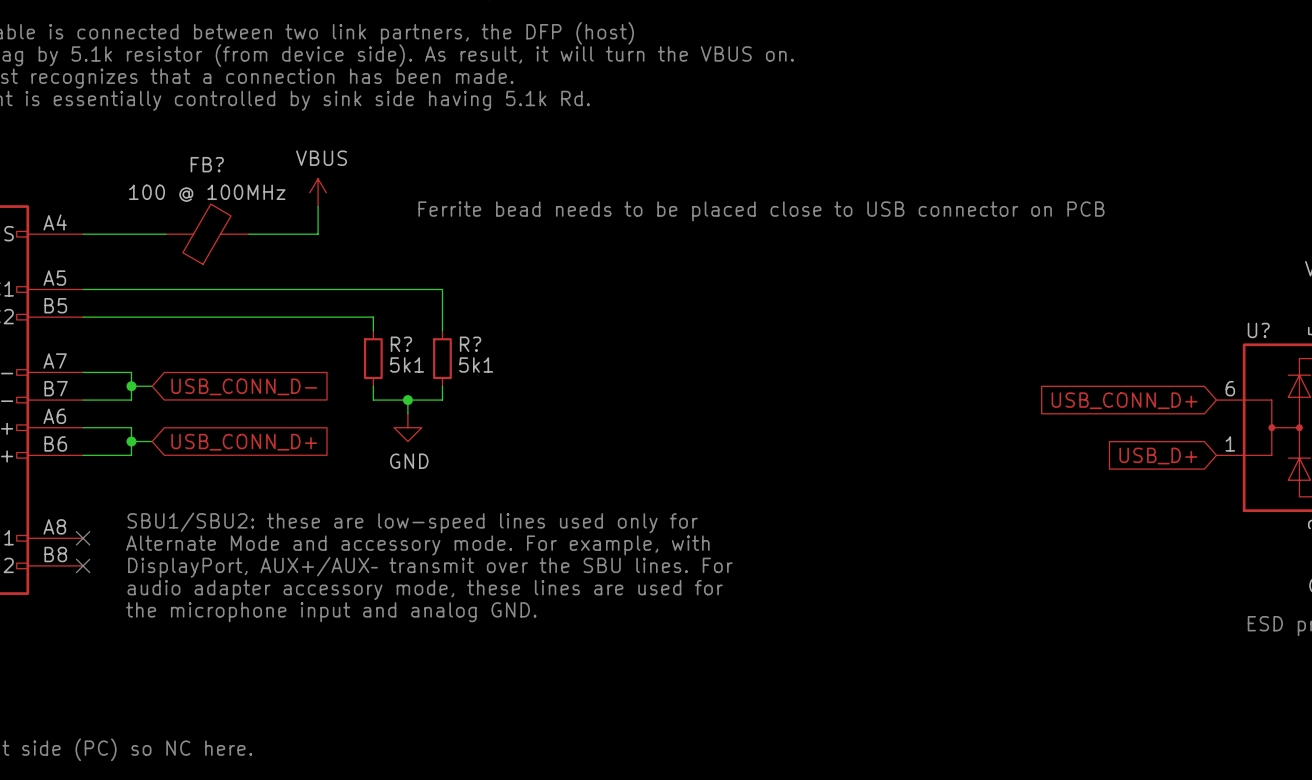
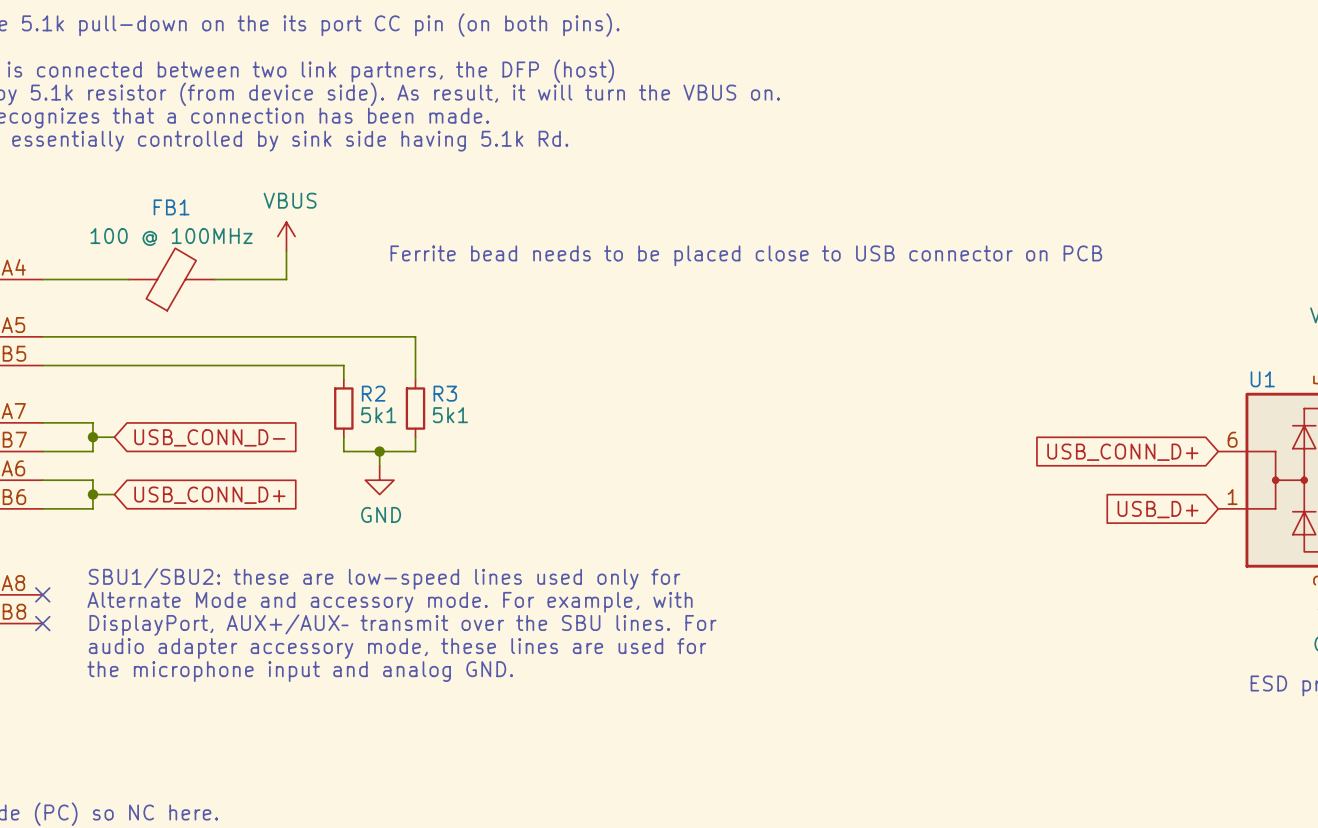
FB? name: FB? (207, 164) -> FB1 (171, 207)
U? name: U? (1258, 330) -> U1 (1262, 379)
R? name: R? (401, 344) -> R2 (373, 393)
R? name: R? (470, 344) -> R3 (445, 393)

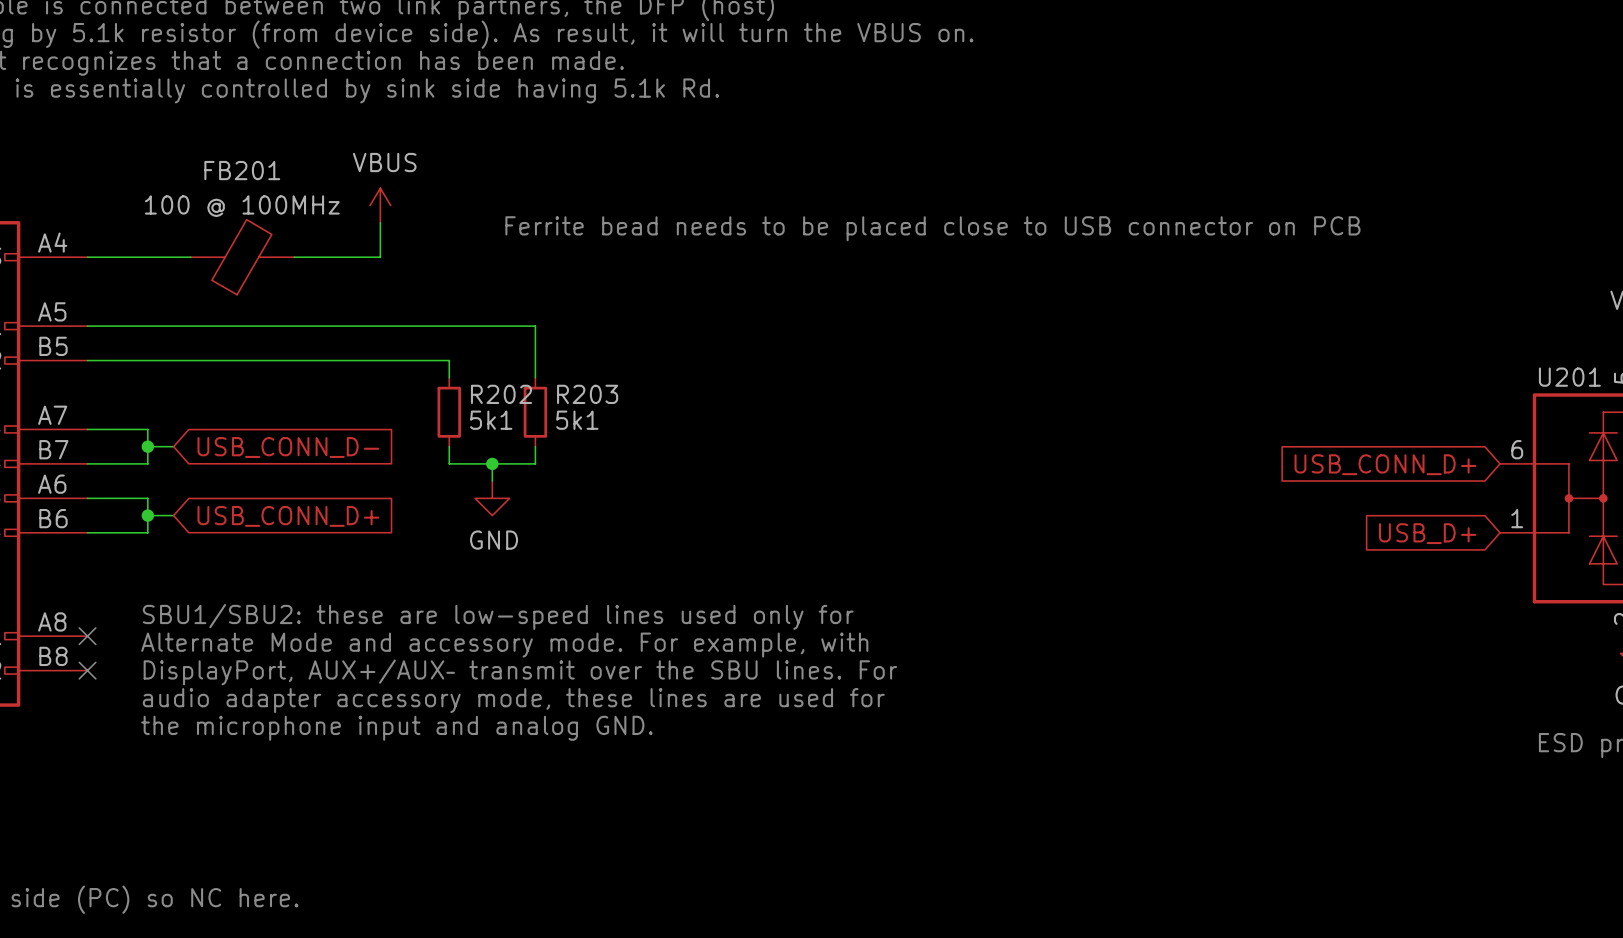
FB1 name: FB1 (171, 207) -> FB201 (242, 170)
U1 name: U1 (1262, 379) -> U201 (1569, 377)
R2 name: R2 (373, 393) -> R202 (501, 394)
R3 name: R3 (445, 393) -> R203 (587, 394)

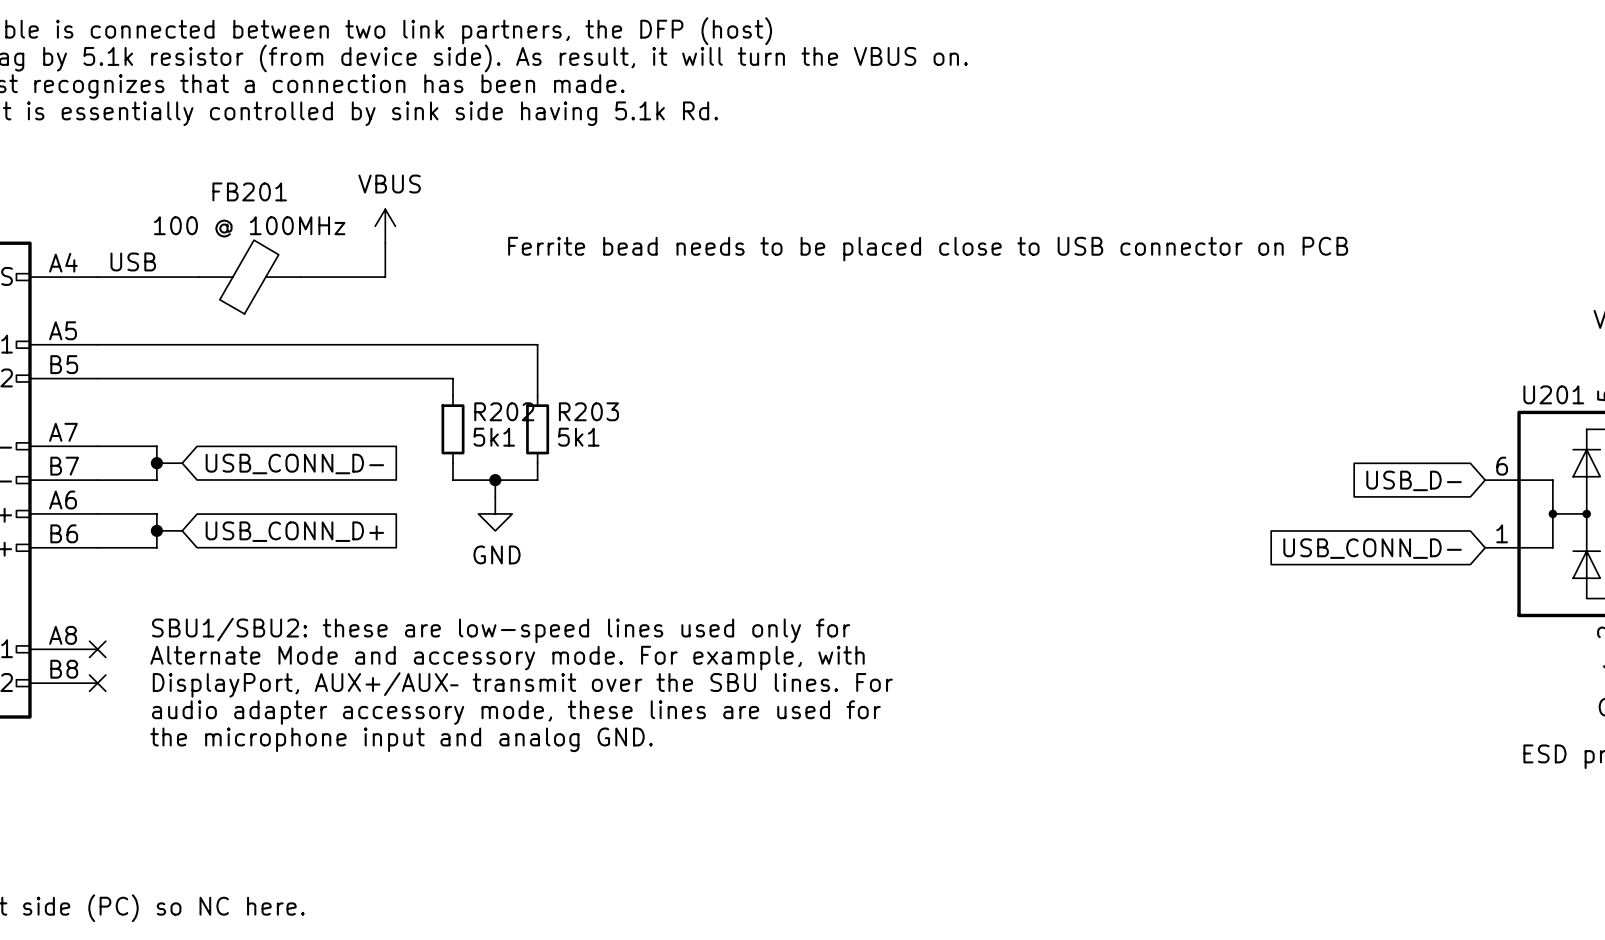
label: none -> USB (133, 261)
global label: USB_CONN_D+ (1385, 464) -> USB_D- (1414, 480)
global label: USB_D+ (1427, 533) -> USB_CONN_D- (1372, 548)

